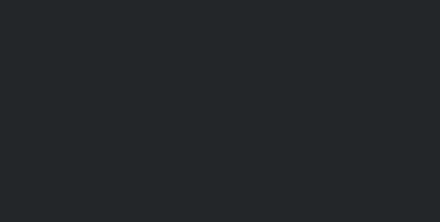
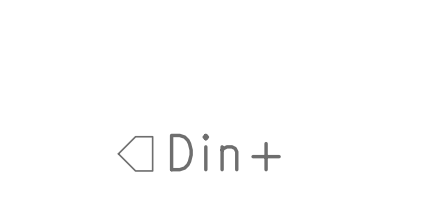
hierarchical label: none -> Din+ (225, 152)

